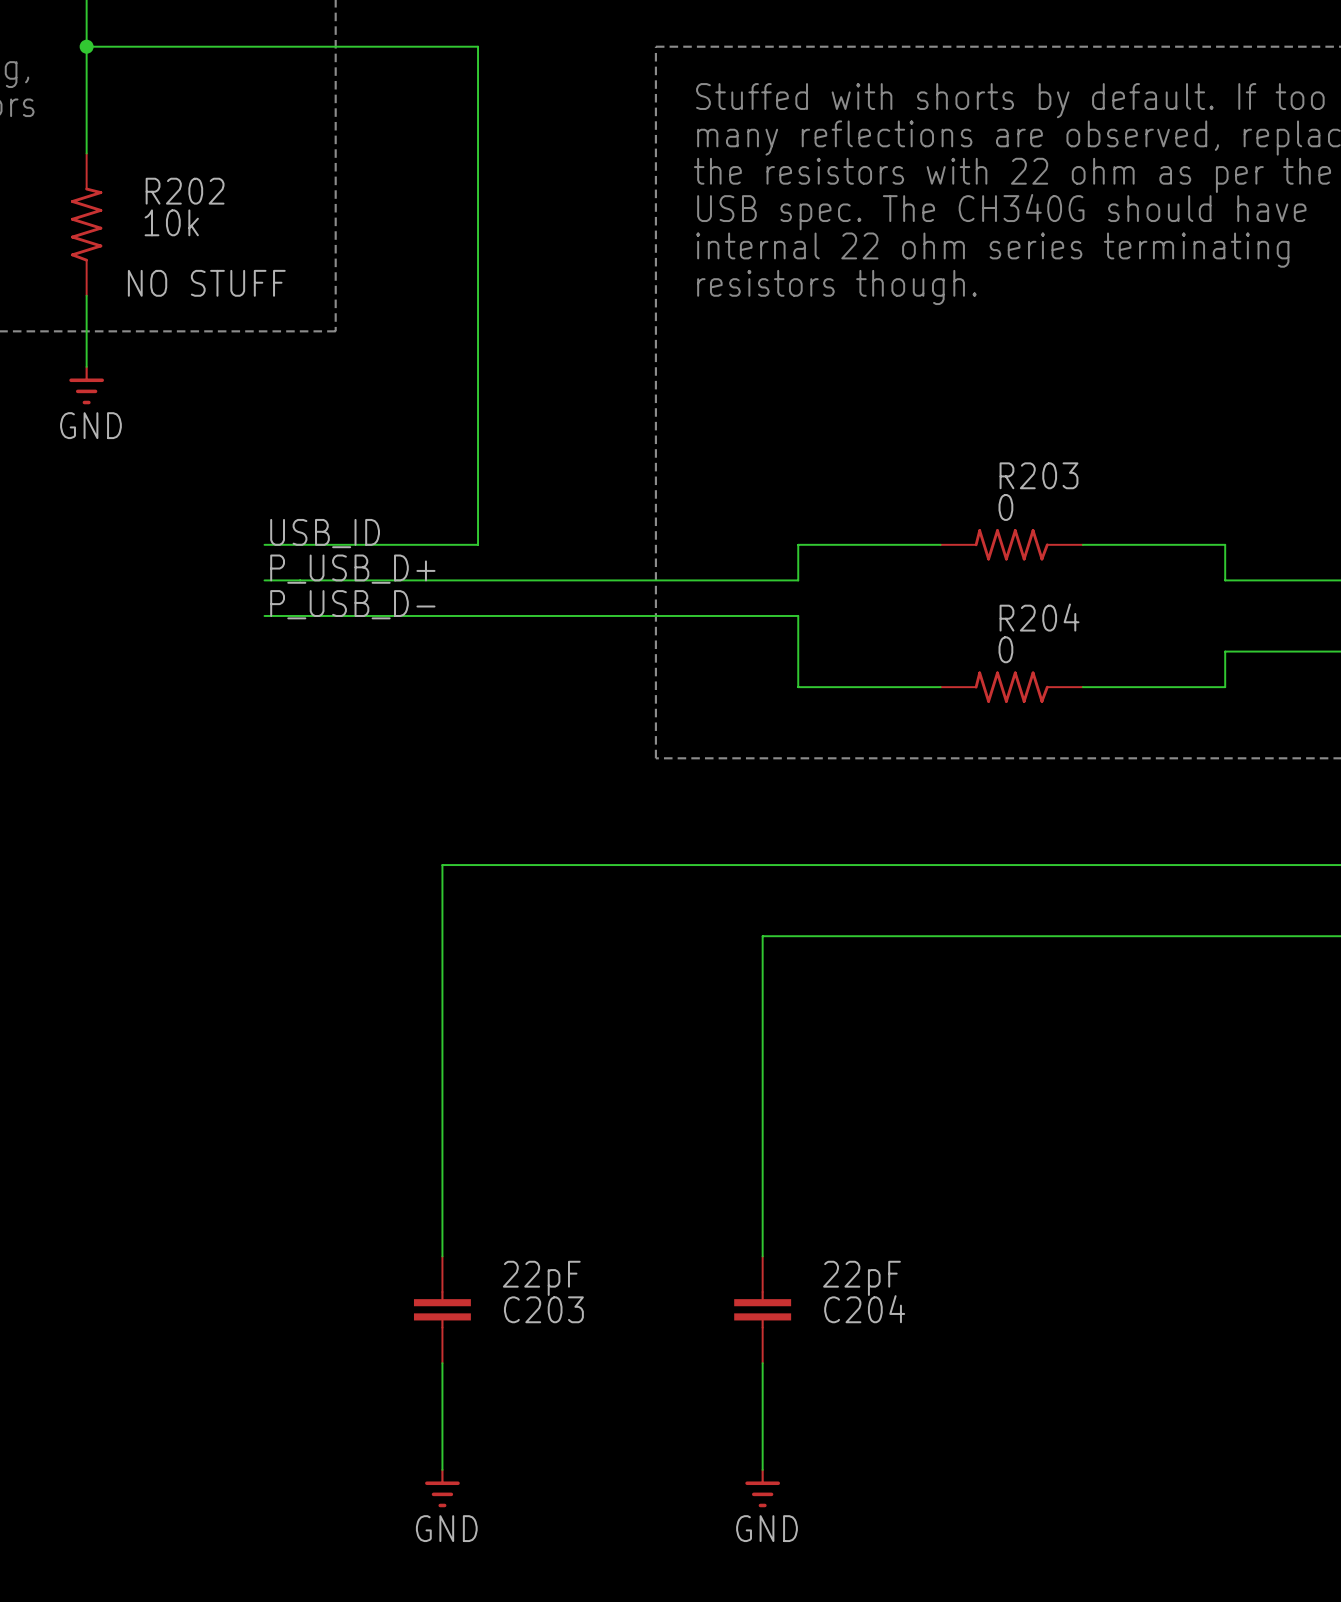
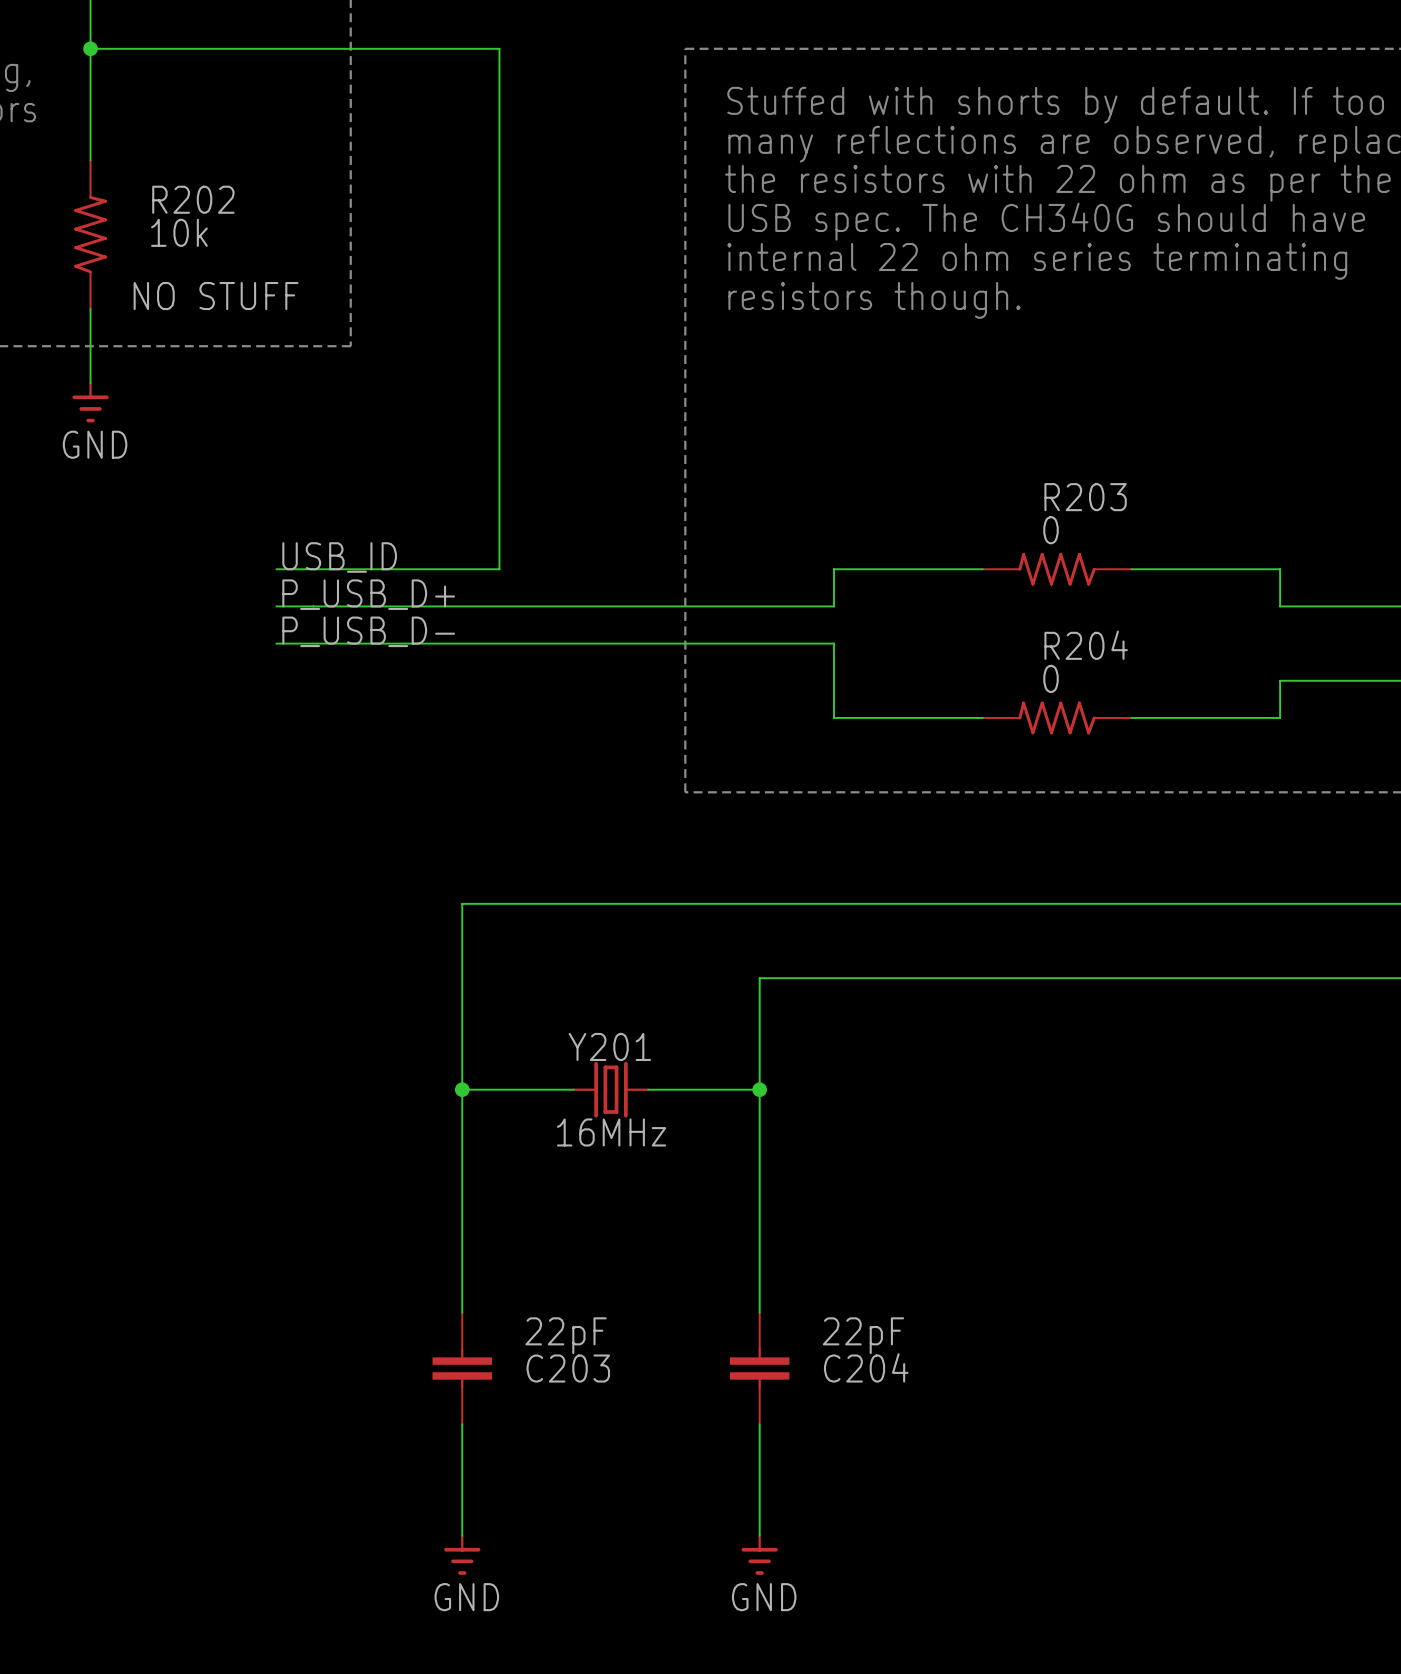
wire: (762, 936) (762, 1256) -> (796, 978) (759, 978) (759, 1312)
wire: none -> (462, 1089) (573, 1089)
junction: none -> (462, 1089)
Y201: none -> 16MHz (610, 1089)
wire: none -> (648, 1089) (759, 1089)
junction: none -> (759, 1089)
C204 position: (762, 1309) -> (759, 1368)
wire: (762, 1363) (762, 1469) -> (759, 1424) (759, 1535)
power symbol position: GND (762, 1488) -> GND (759, 1554)

